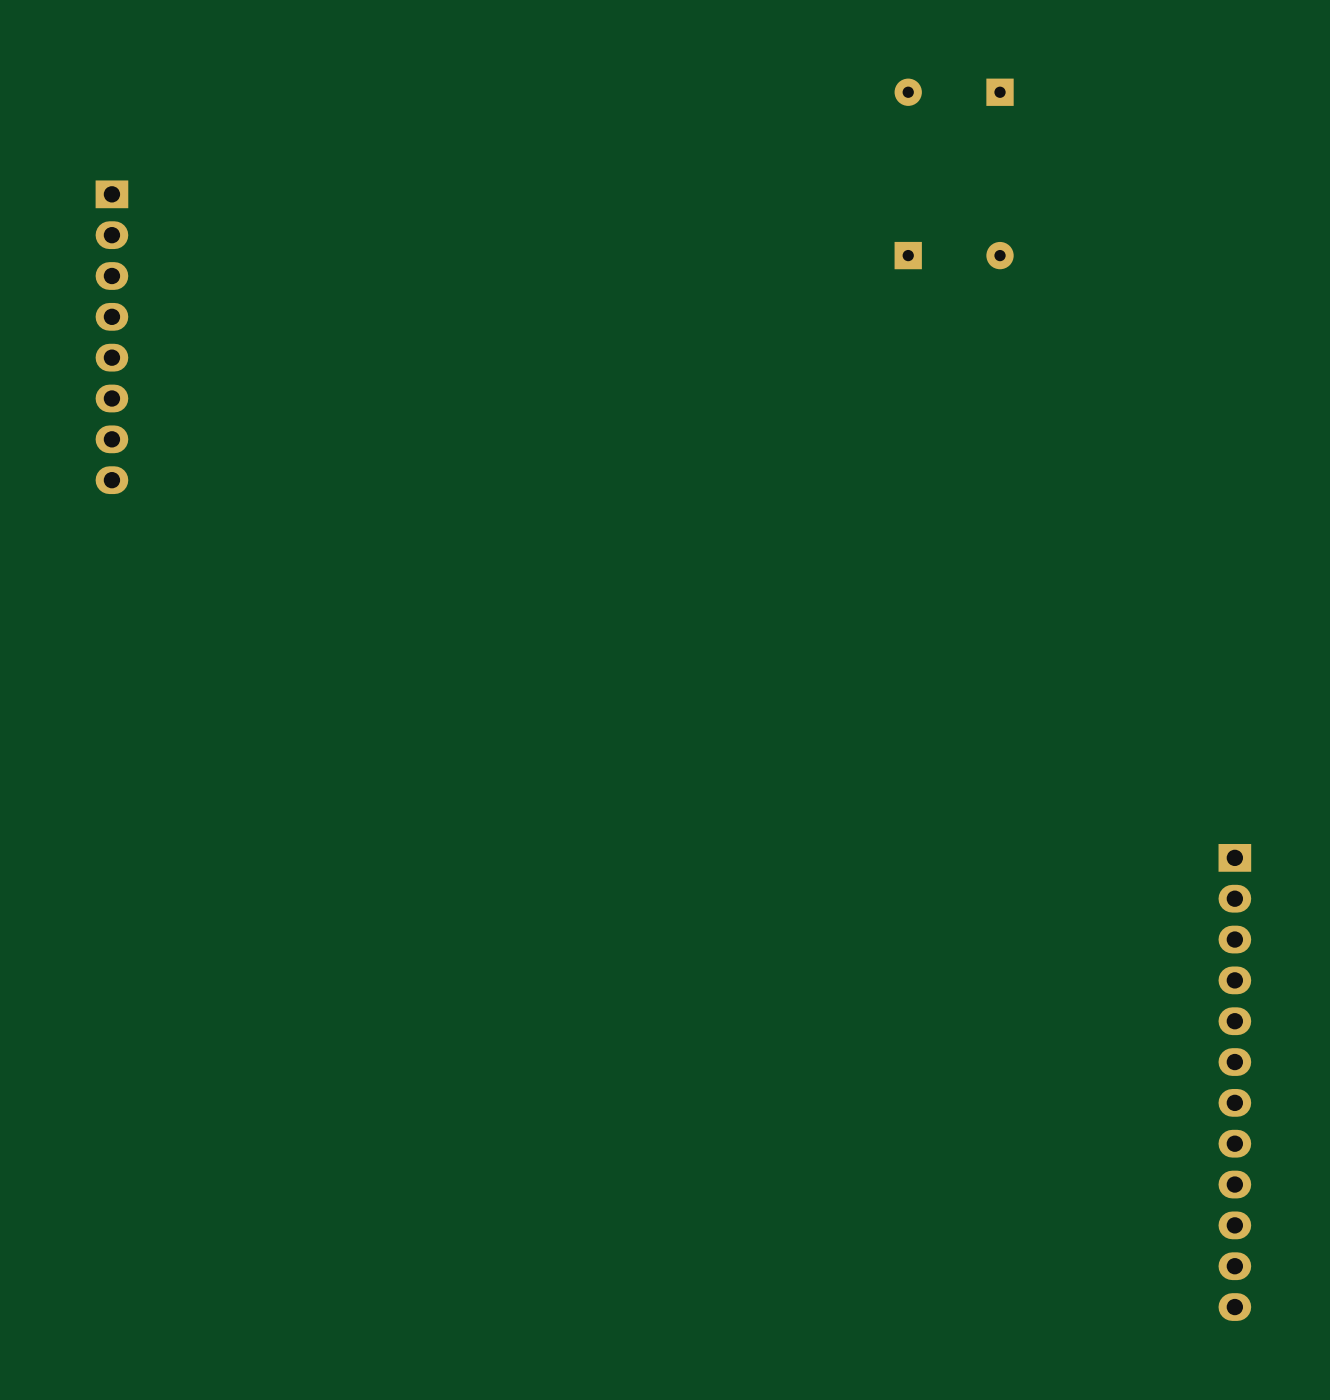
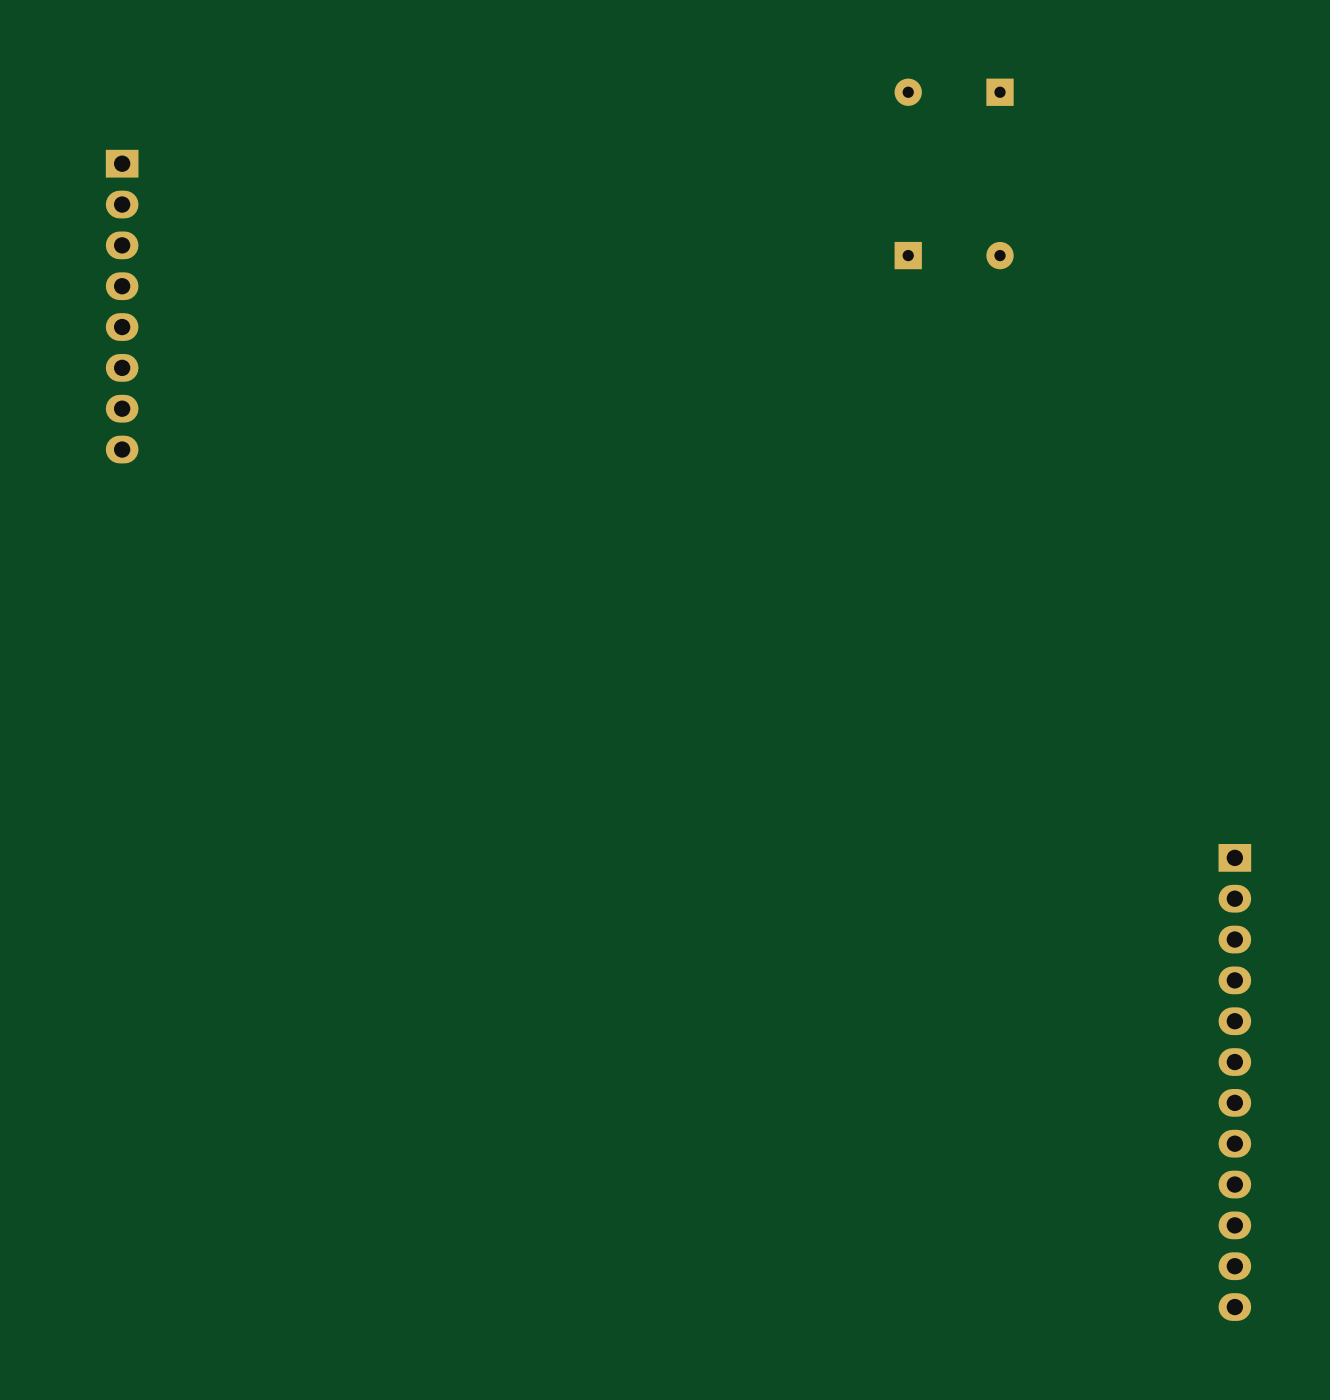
part position: (111, 337) -> (122, 306)

